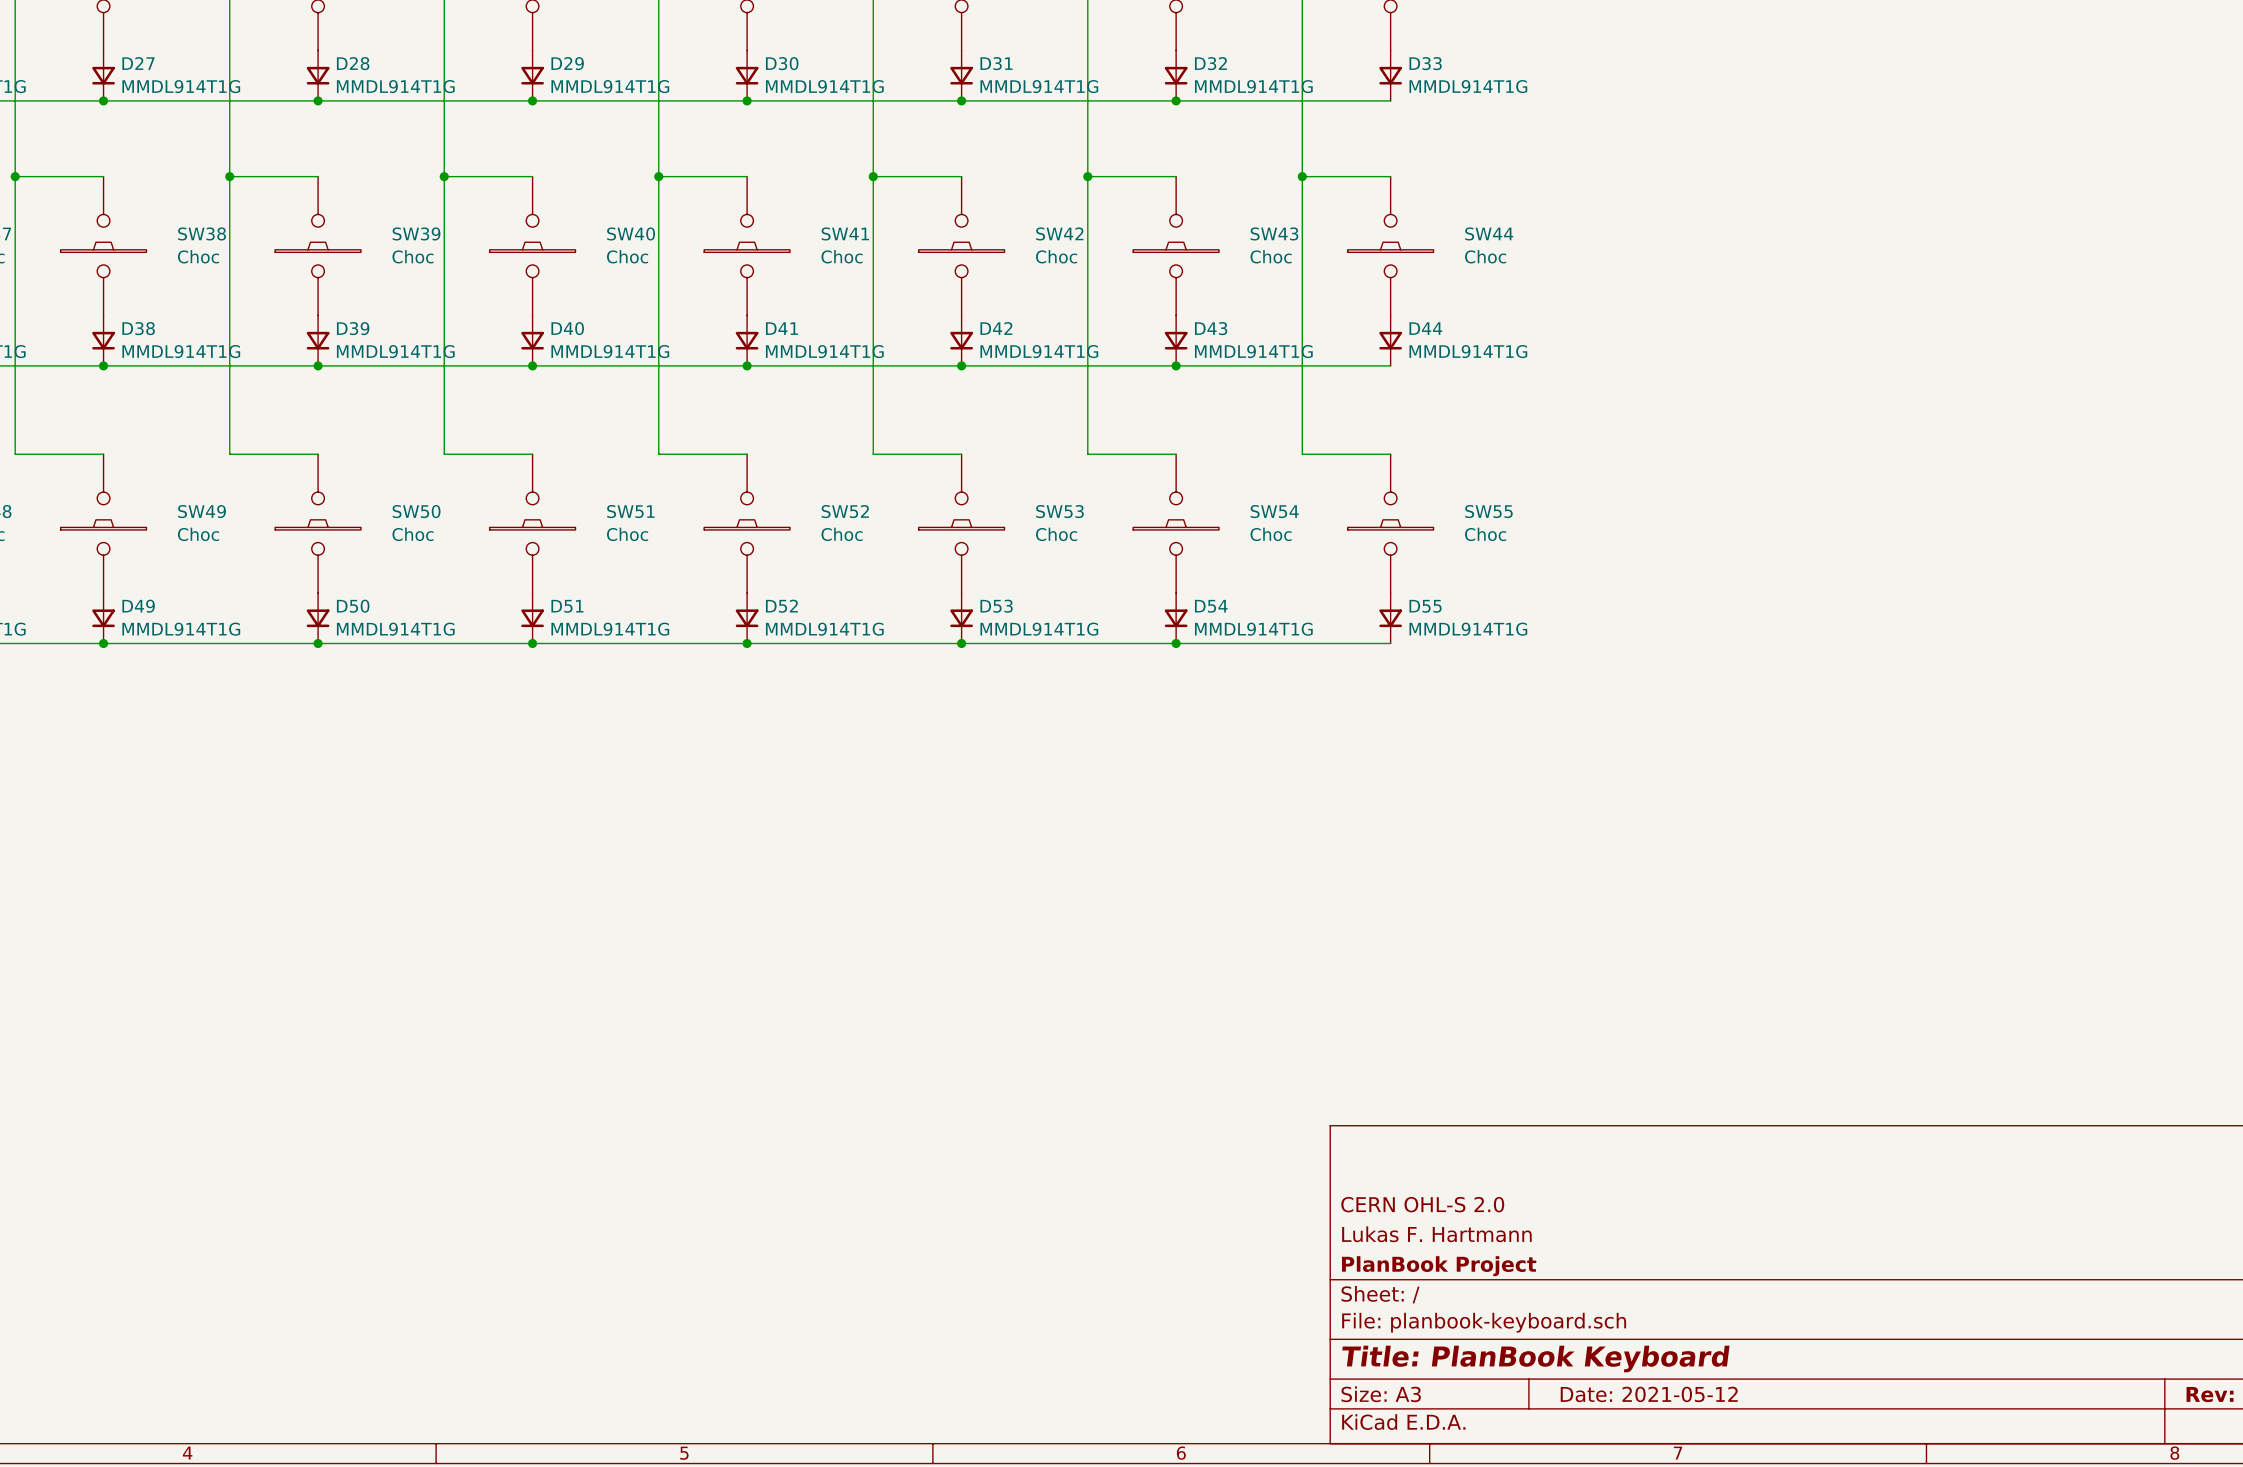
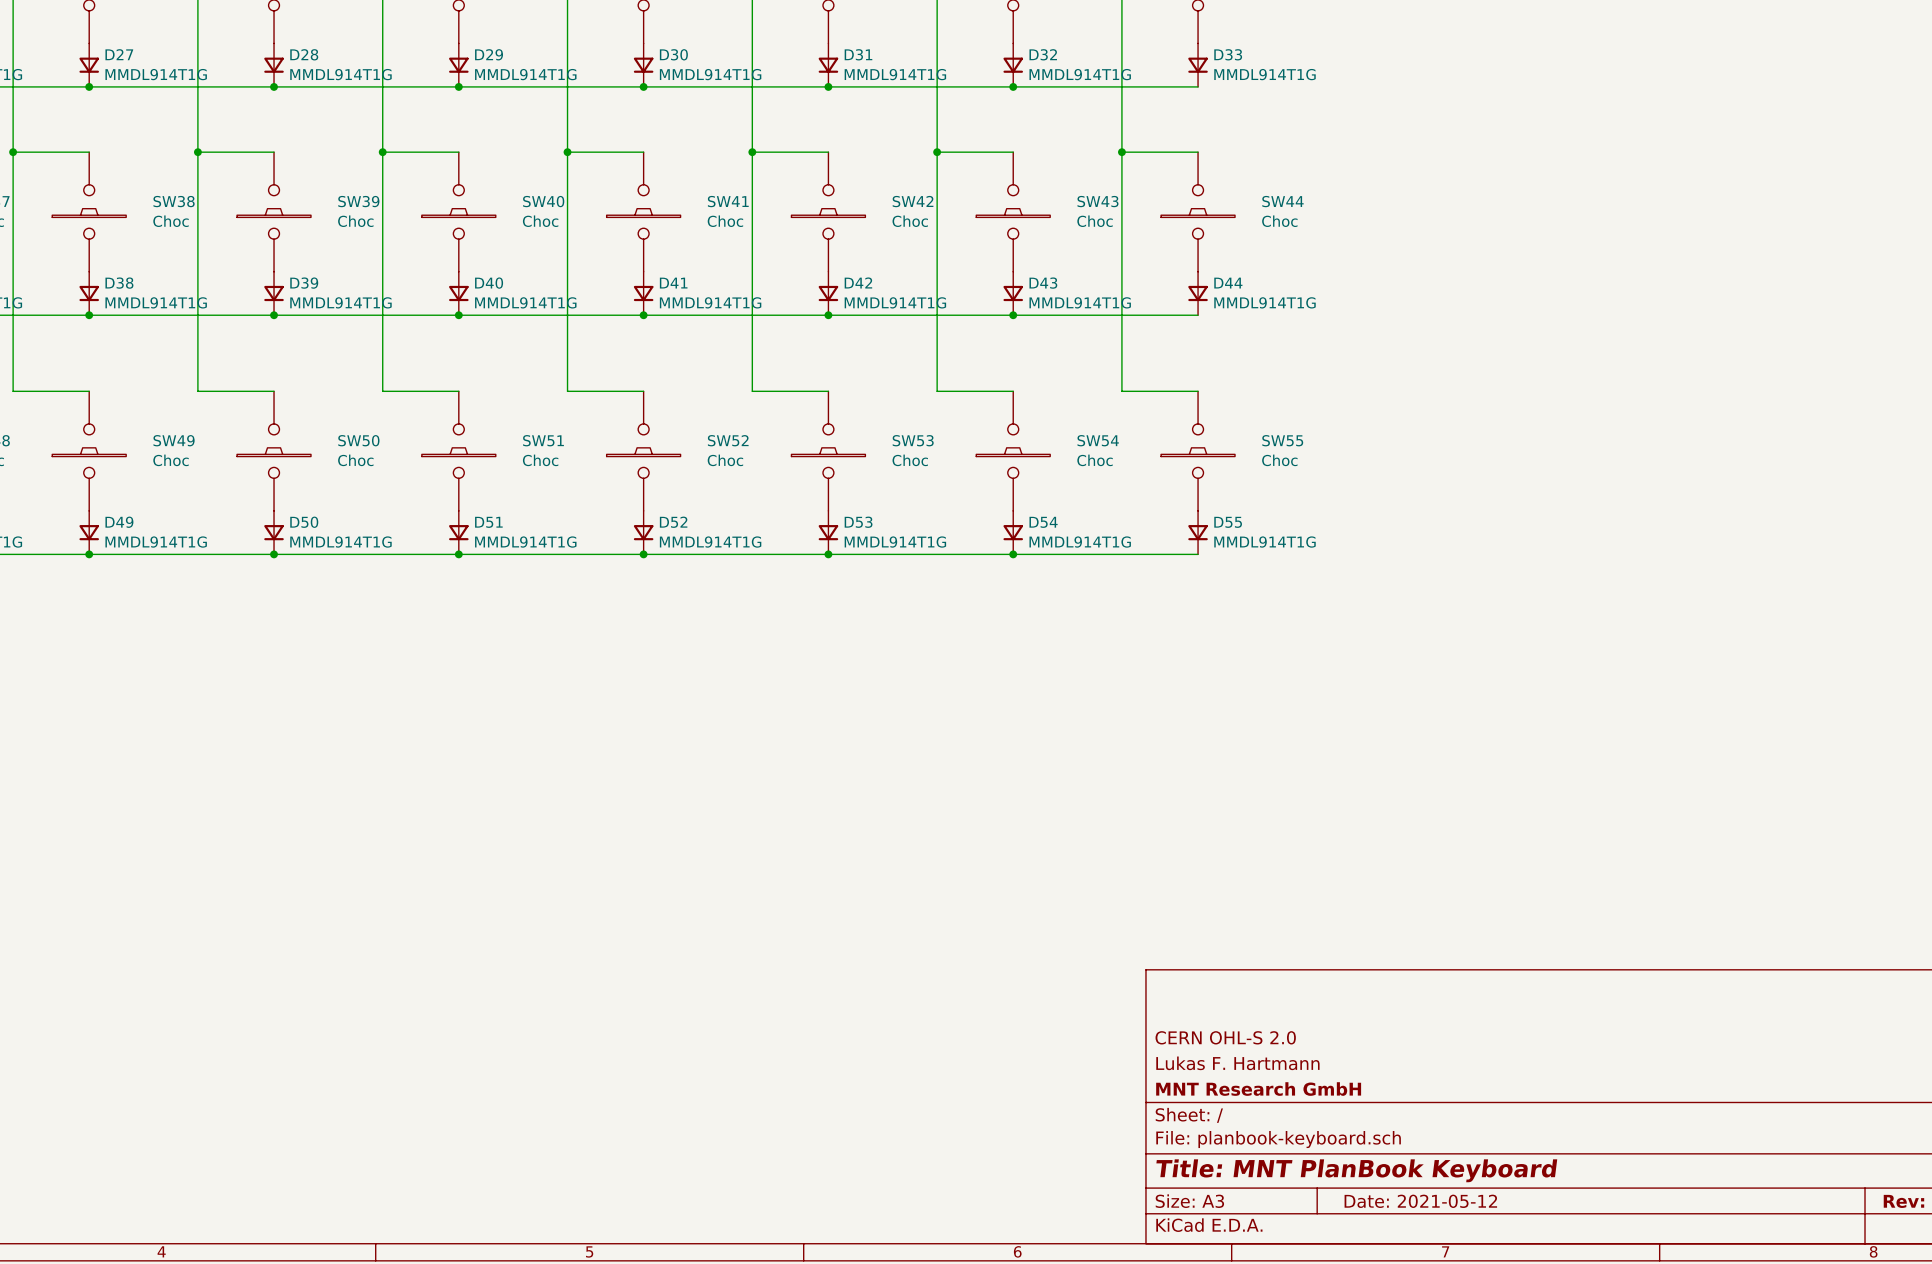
title block: PlanBook Project (1439, 1266) -> MNT Research GmbH (1258, 1089)
title block: Title: PlanBook Keyboard (1535, 1359) -> Title: MNT PlanBook Keyboard (1356, 1170)

